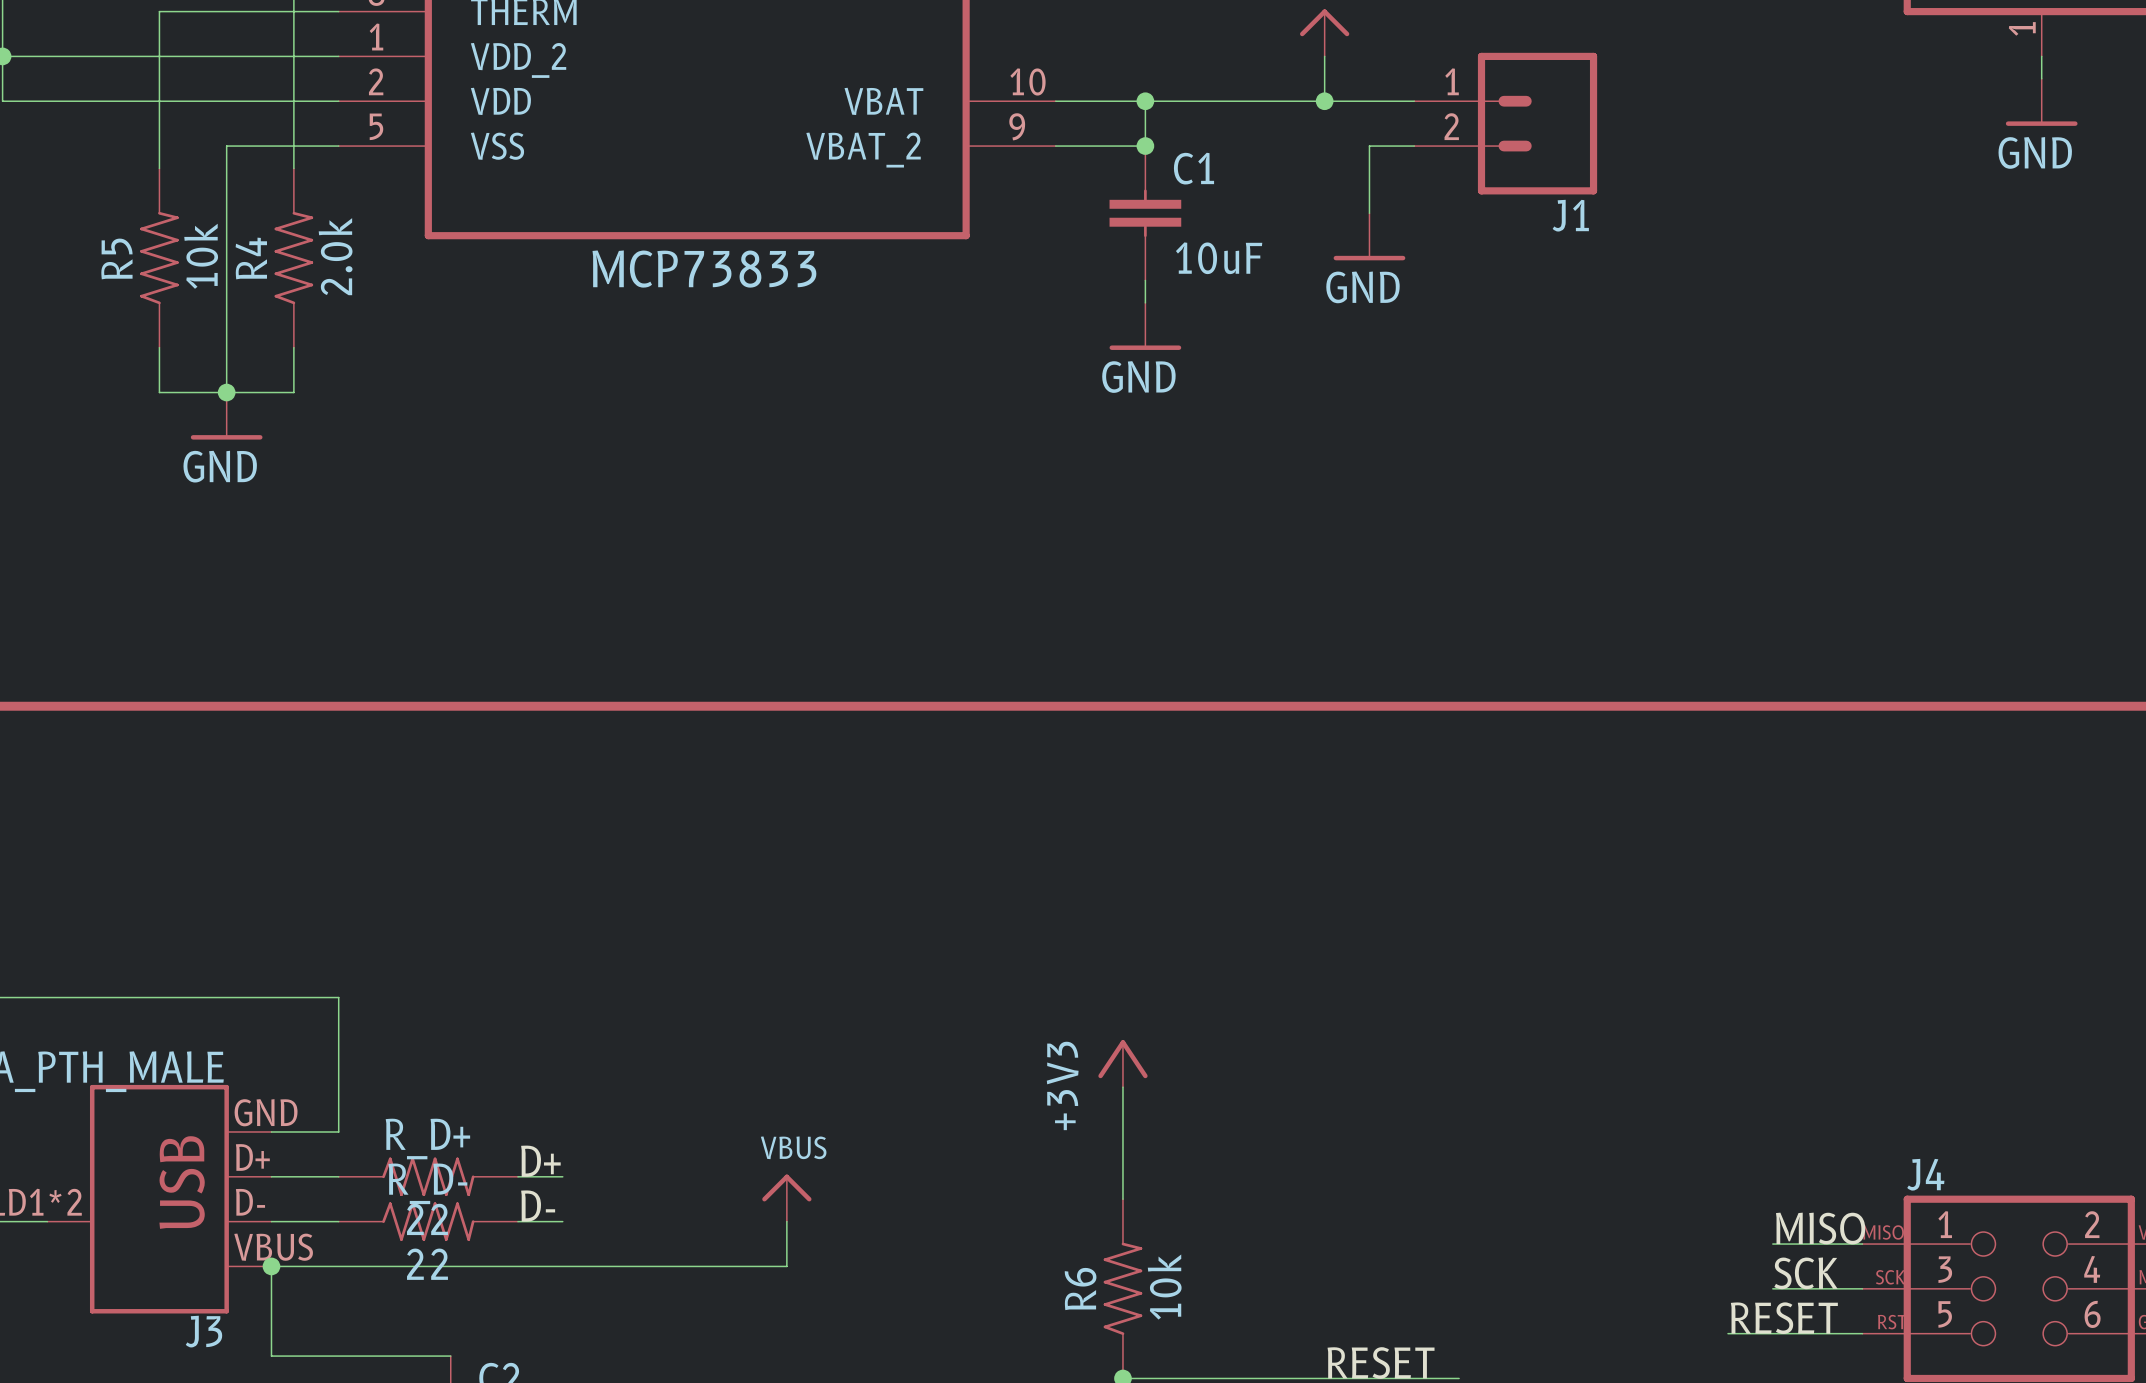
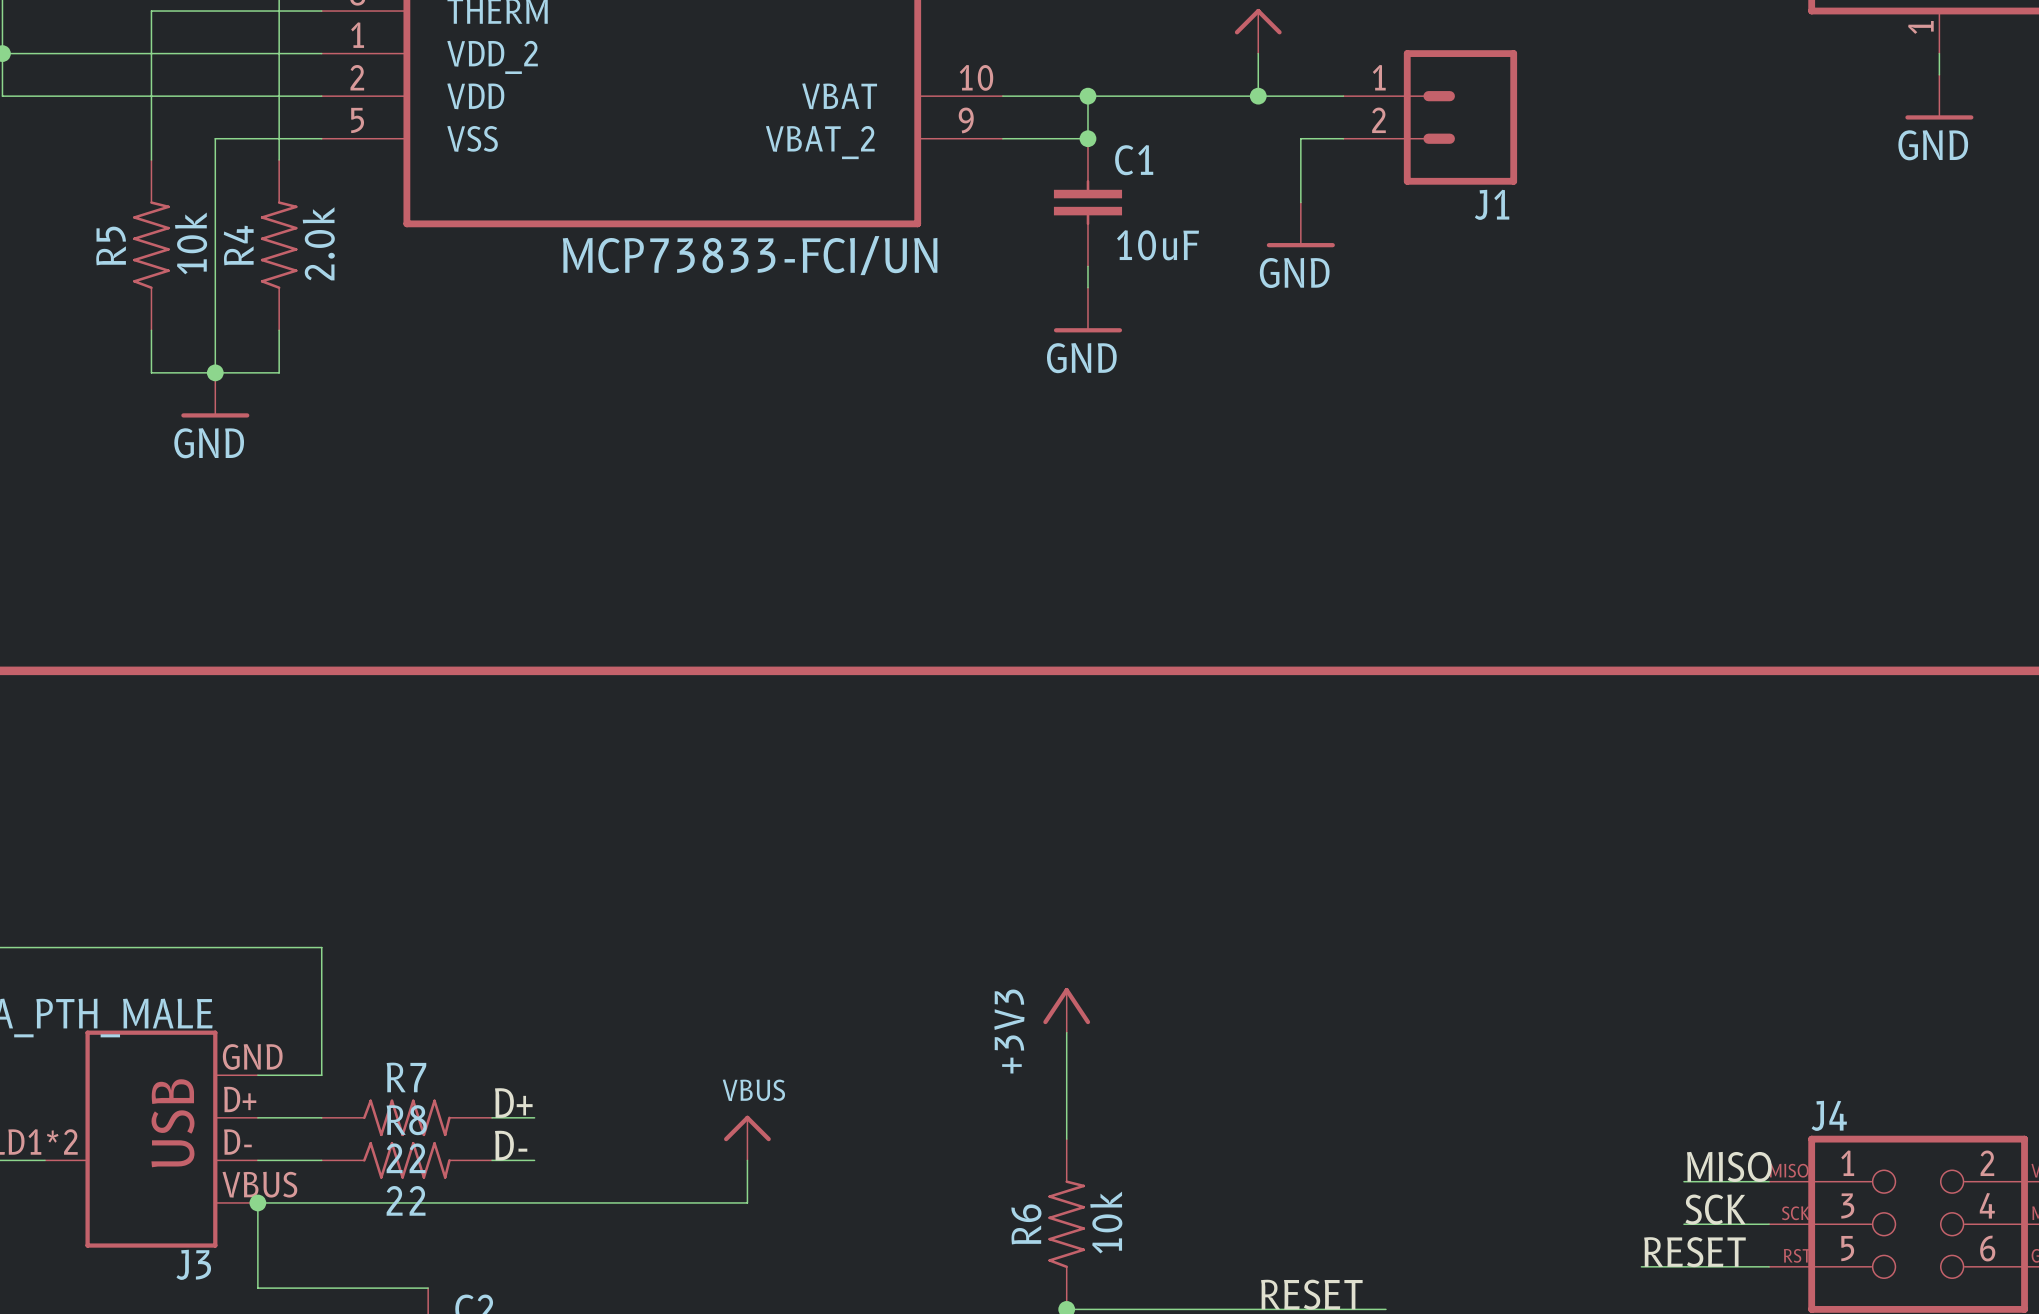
part value: MCP73833 (704, 269) -> MCP73833-FCI/UN (750, 255)
R_D+ name: R_D+ (427, 1139) -> R7 (406, 1077)
R_D- name: R_D- (427, 1183) -> R8 (406, 1120)

